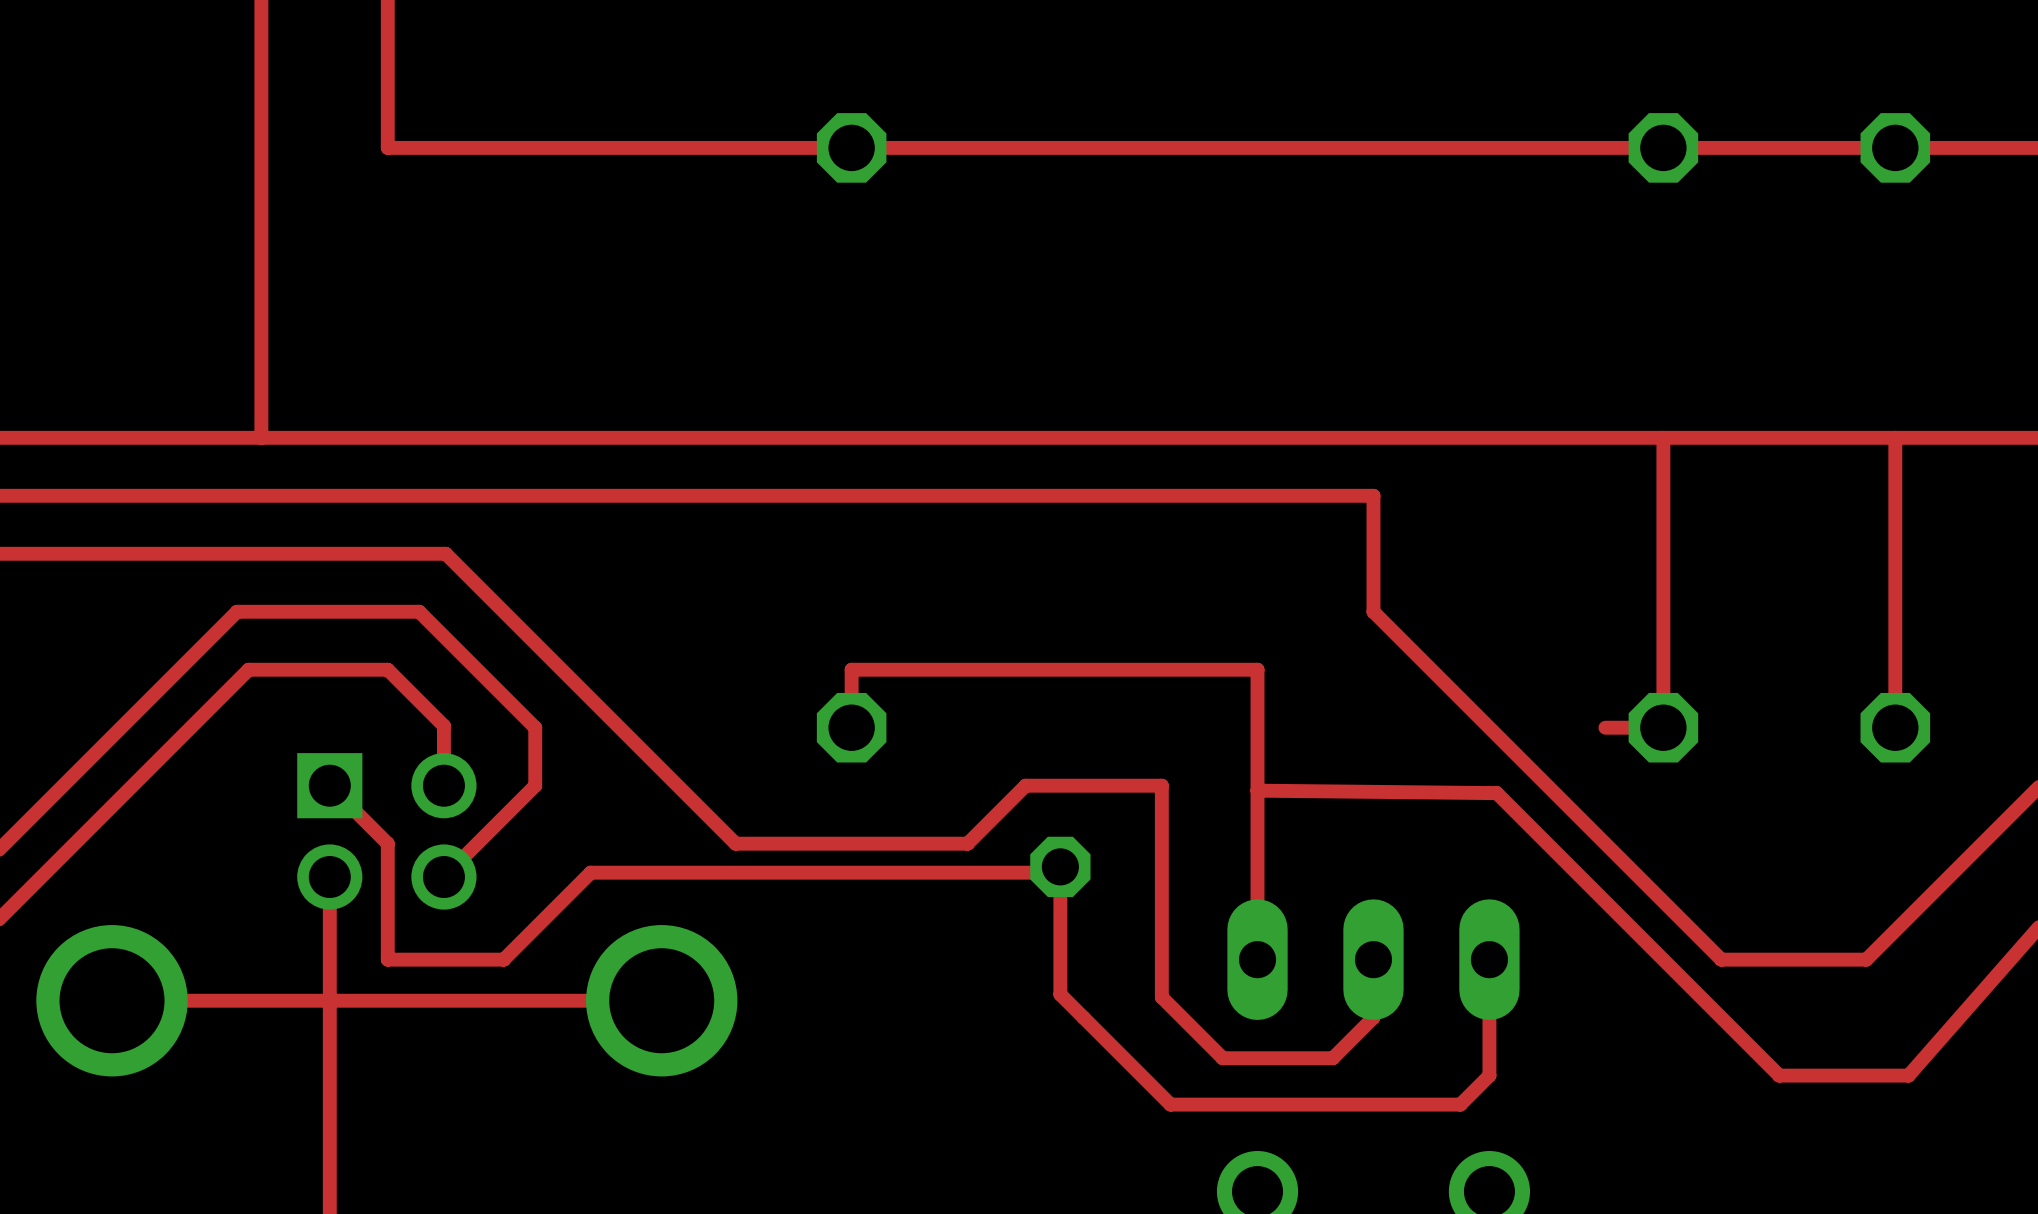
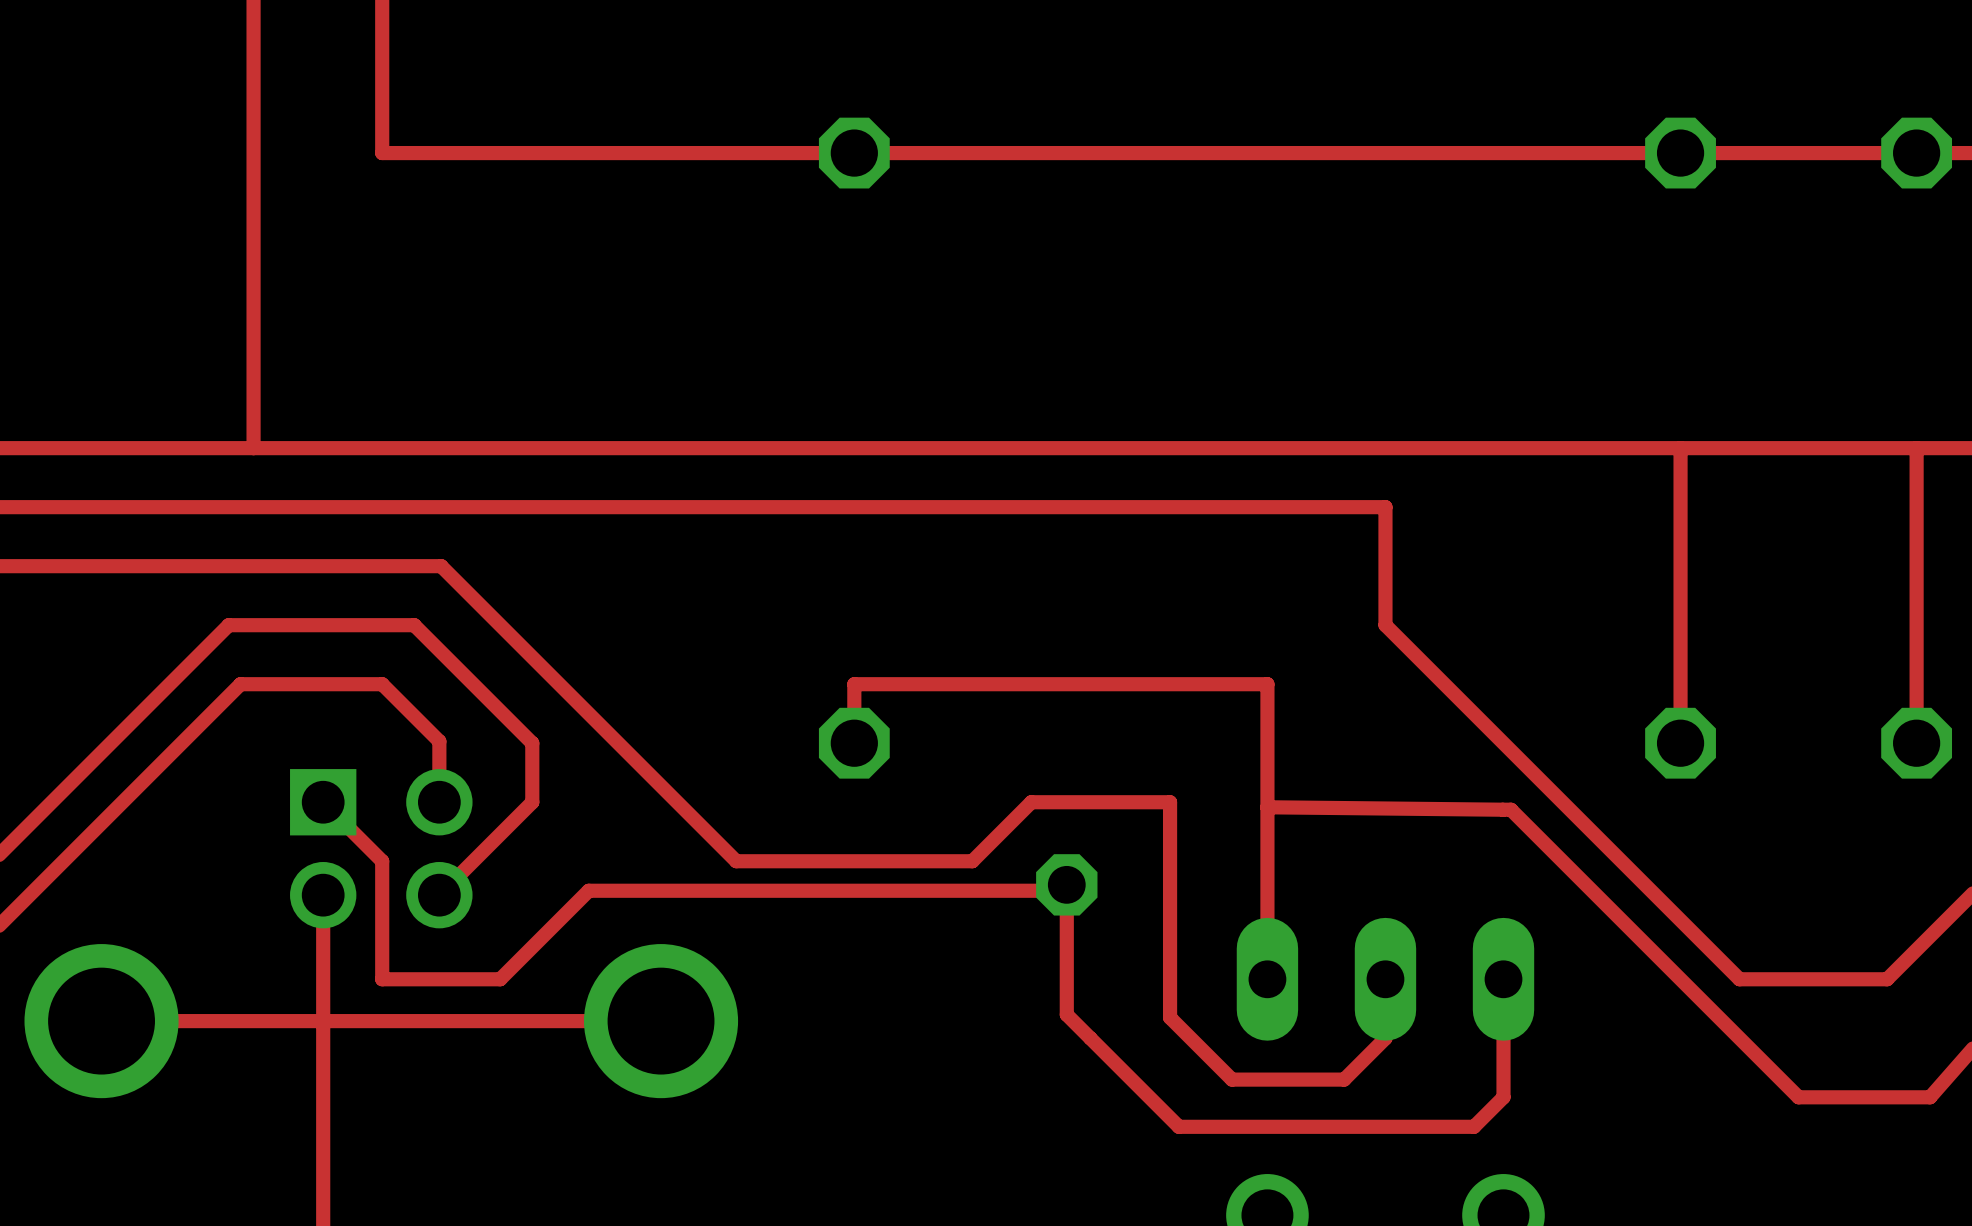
top track: (1663, 727) (1605, 727) -> none

